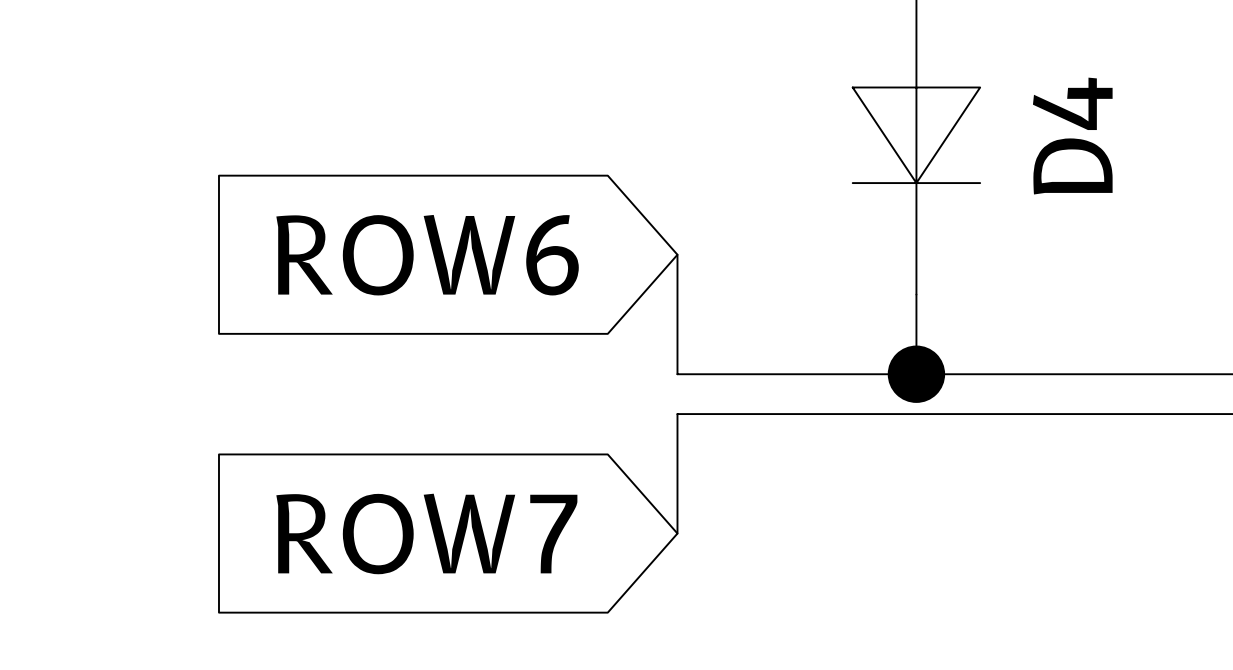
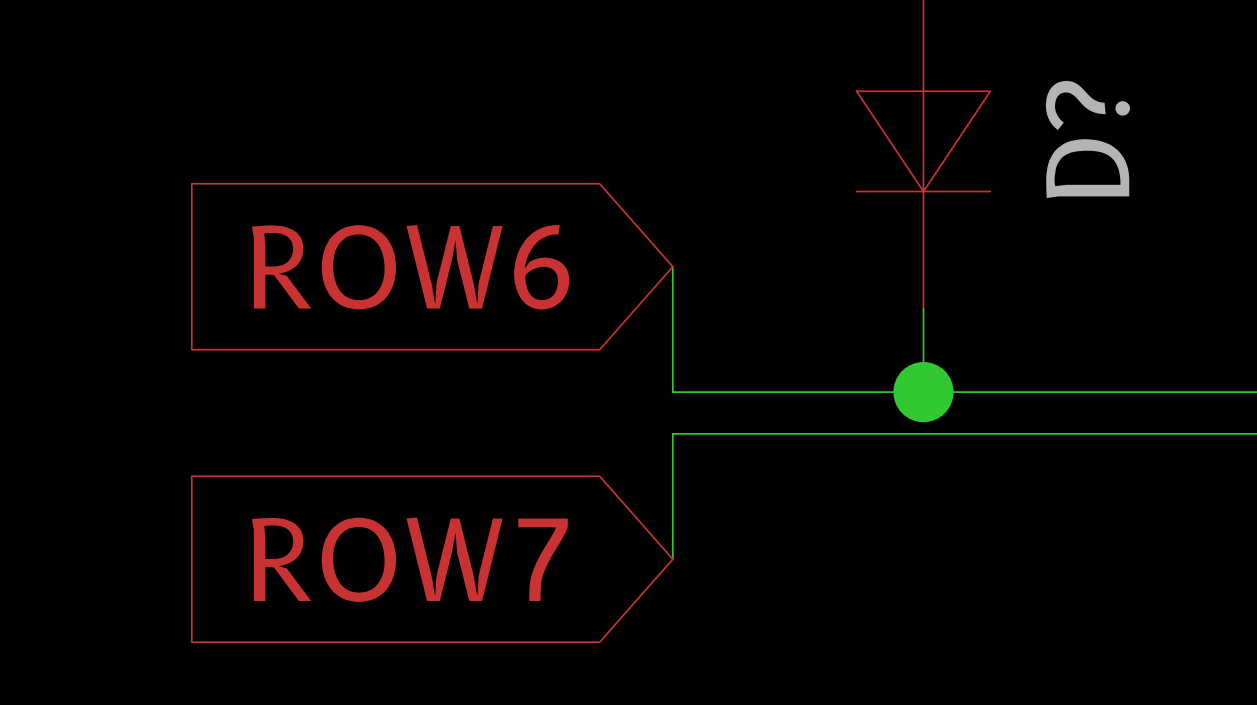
D4 name: D4 (1072, 136) -> D? (1087, 139)

